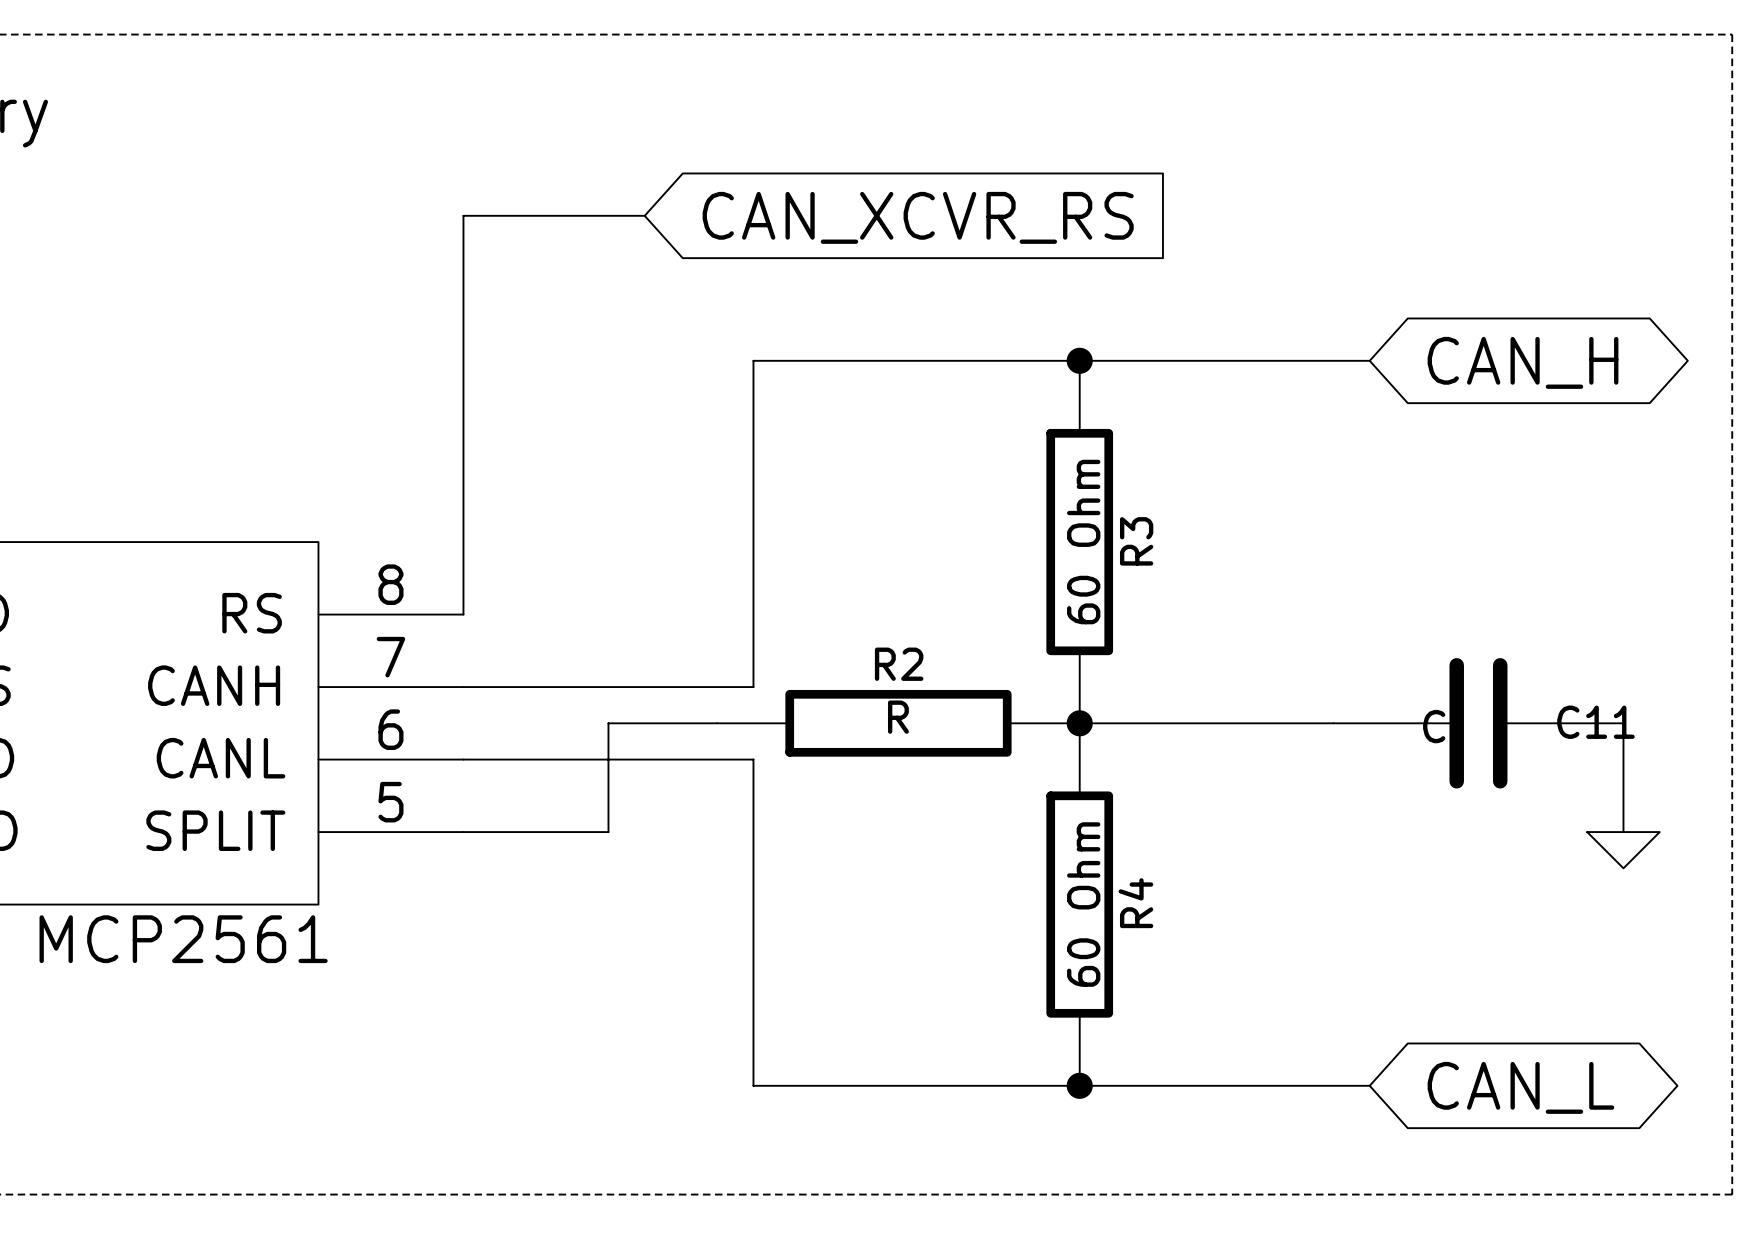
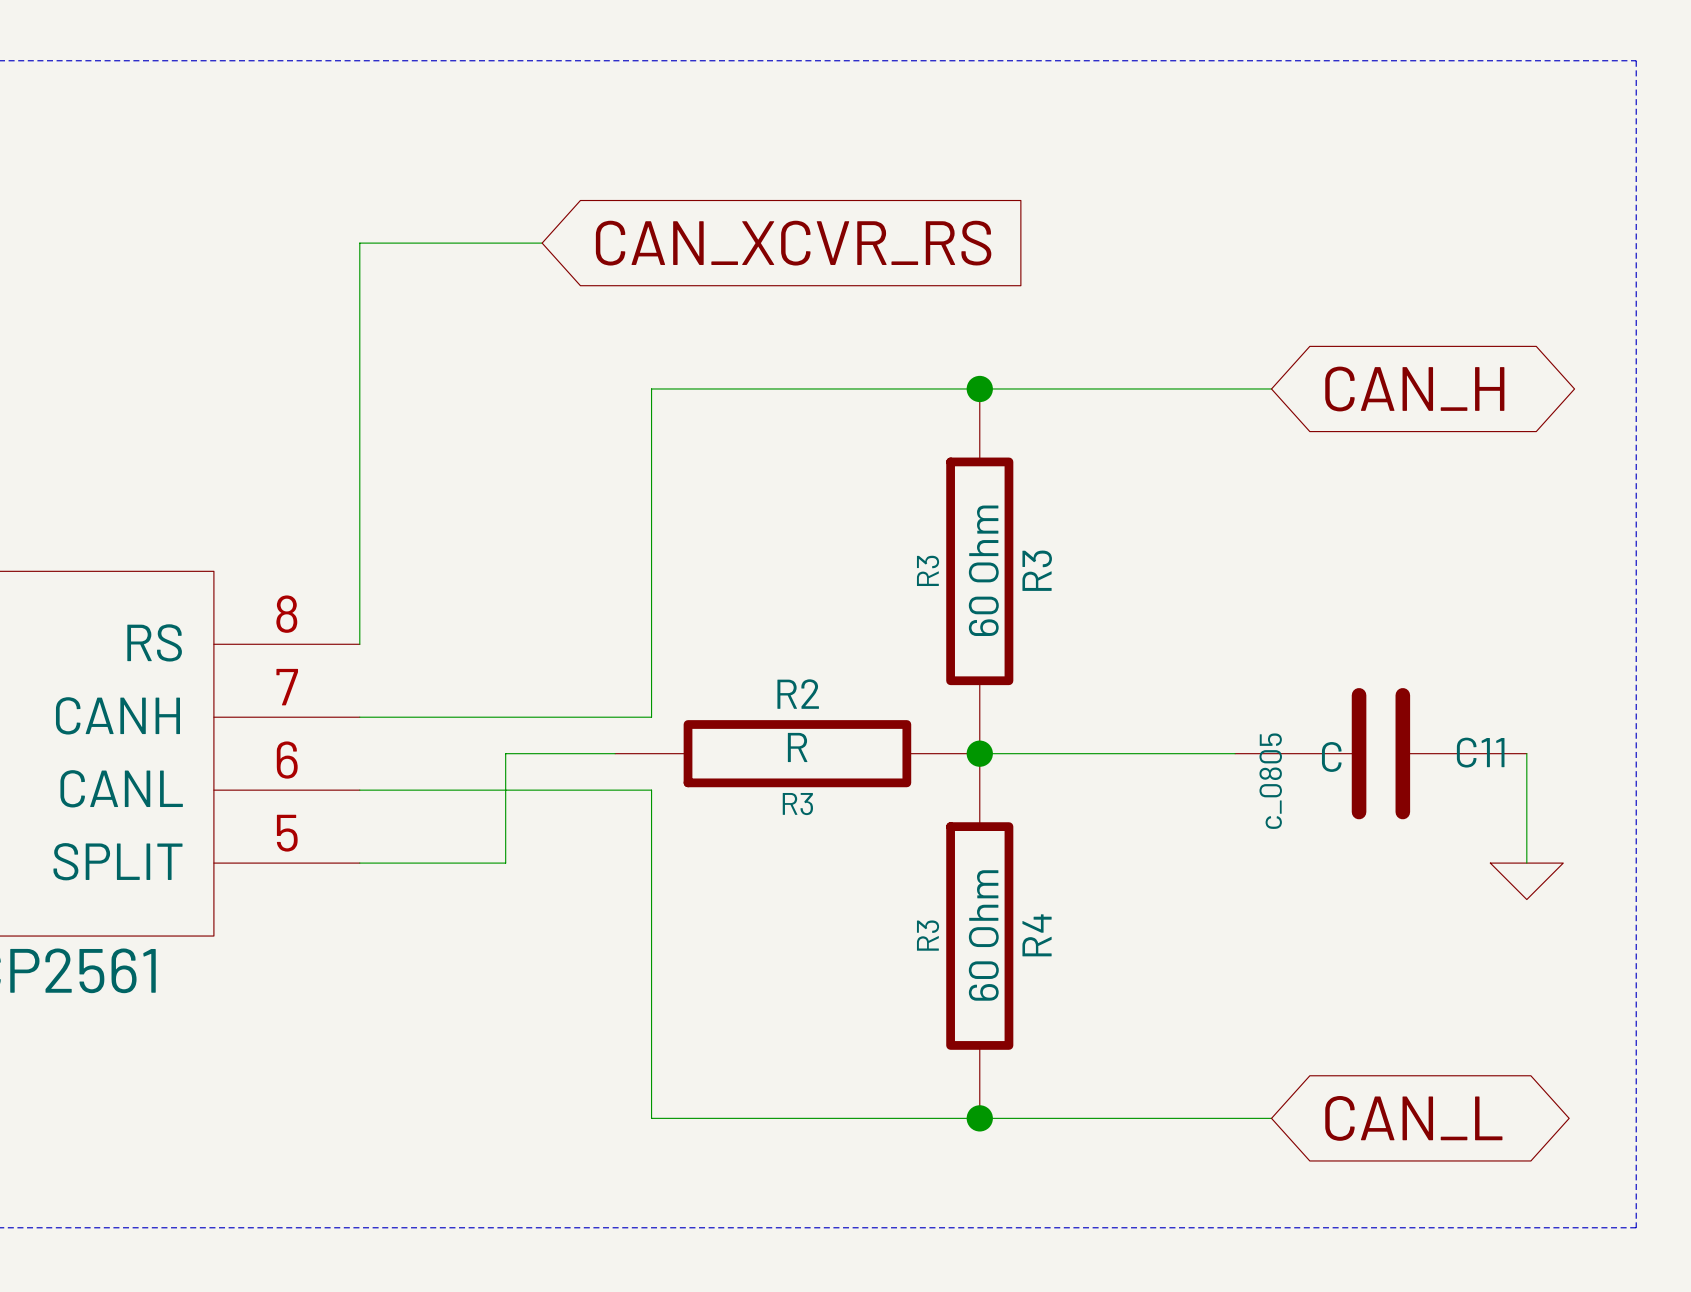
R3 text: none -> R3 (928, 570)
C11 text: none -> c_0805 (1270, 781)
R2 text: none -> R3 (797, 804)
R4 text: none -> R3 (928, 935)

